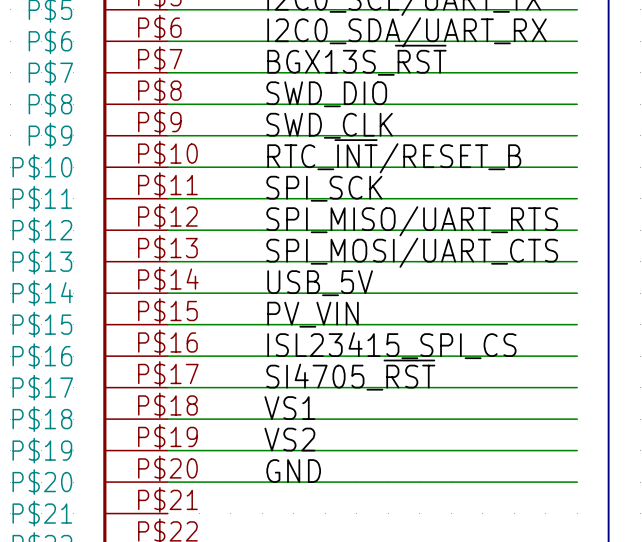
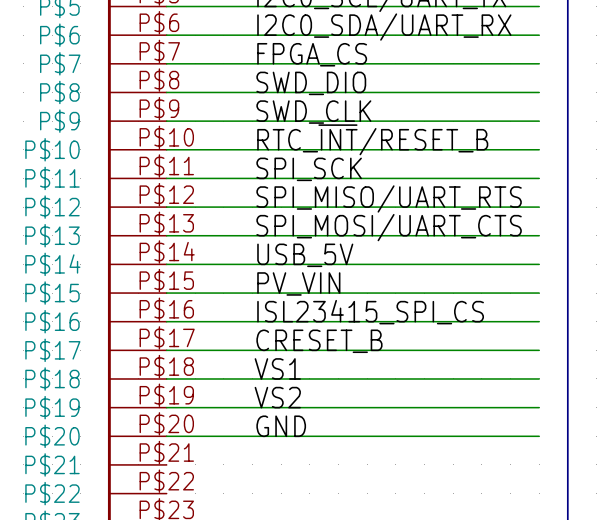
label: BGX13S_~{RST} (356, 60) -> FPGA_CS (312, 54)
label: SI4705_~{RST} (350, 375) -> CRESET_B (319, 341)

